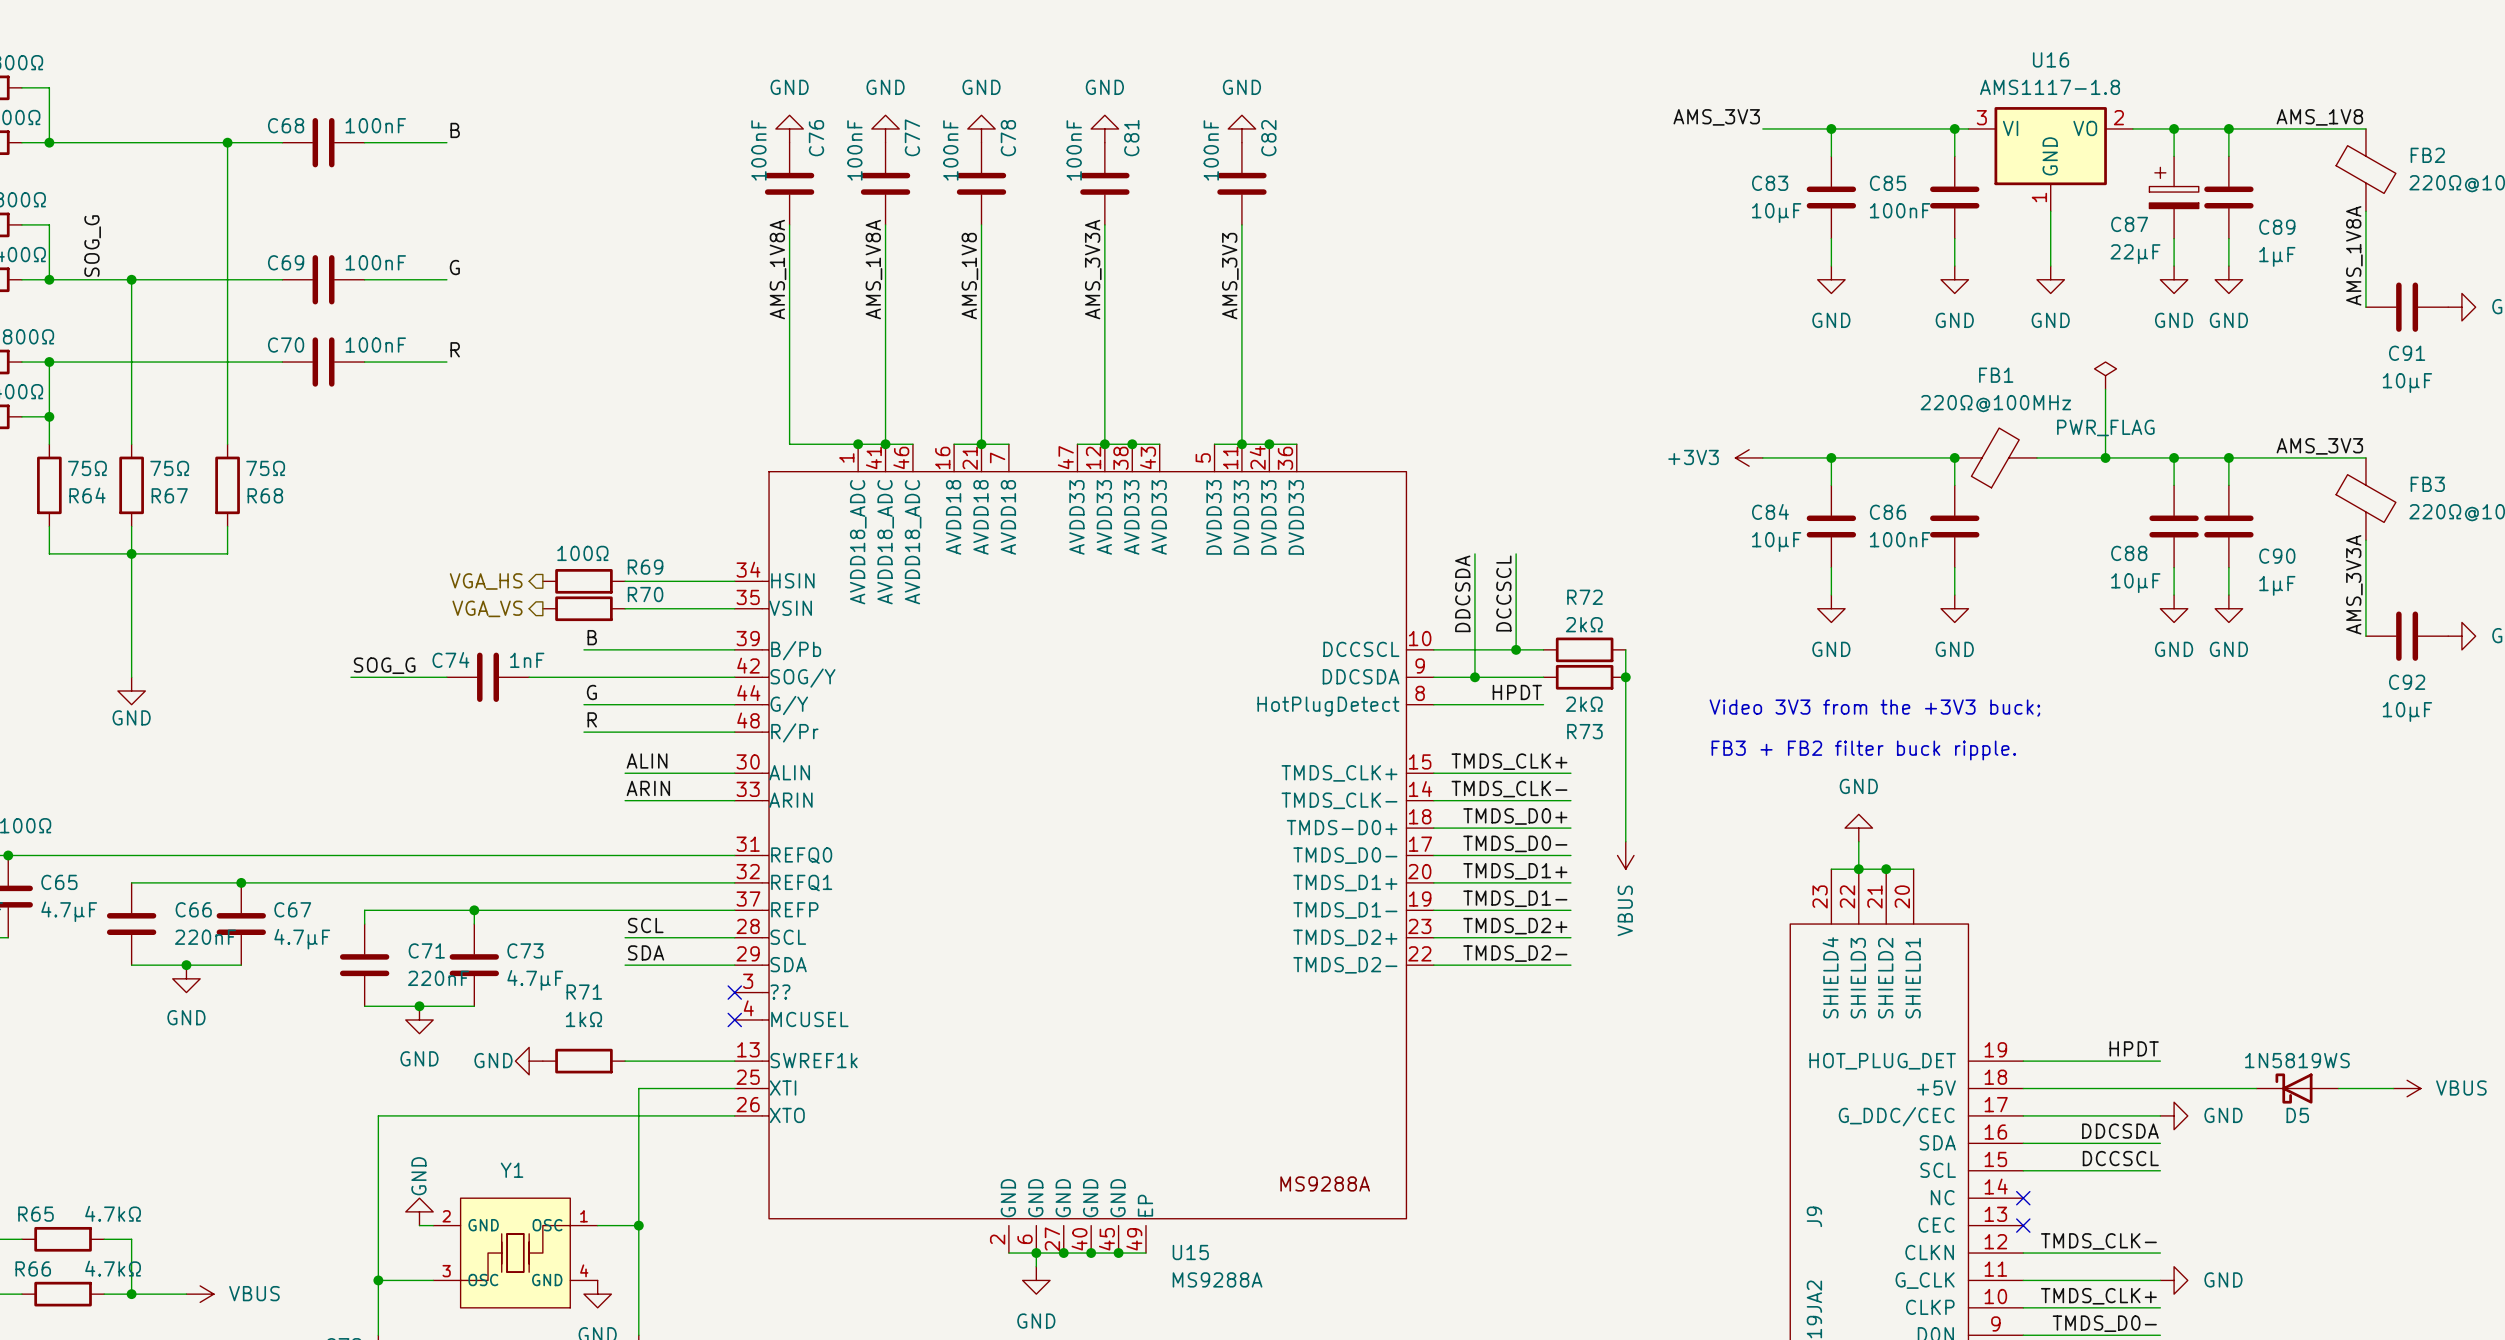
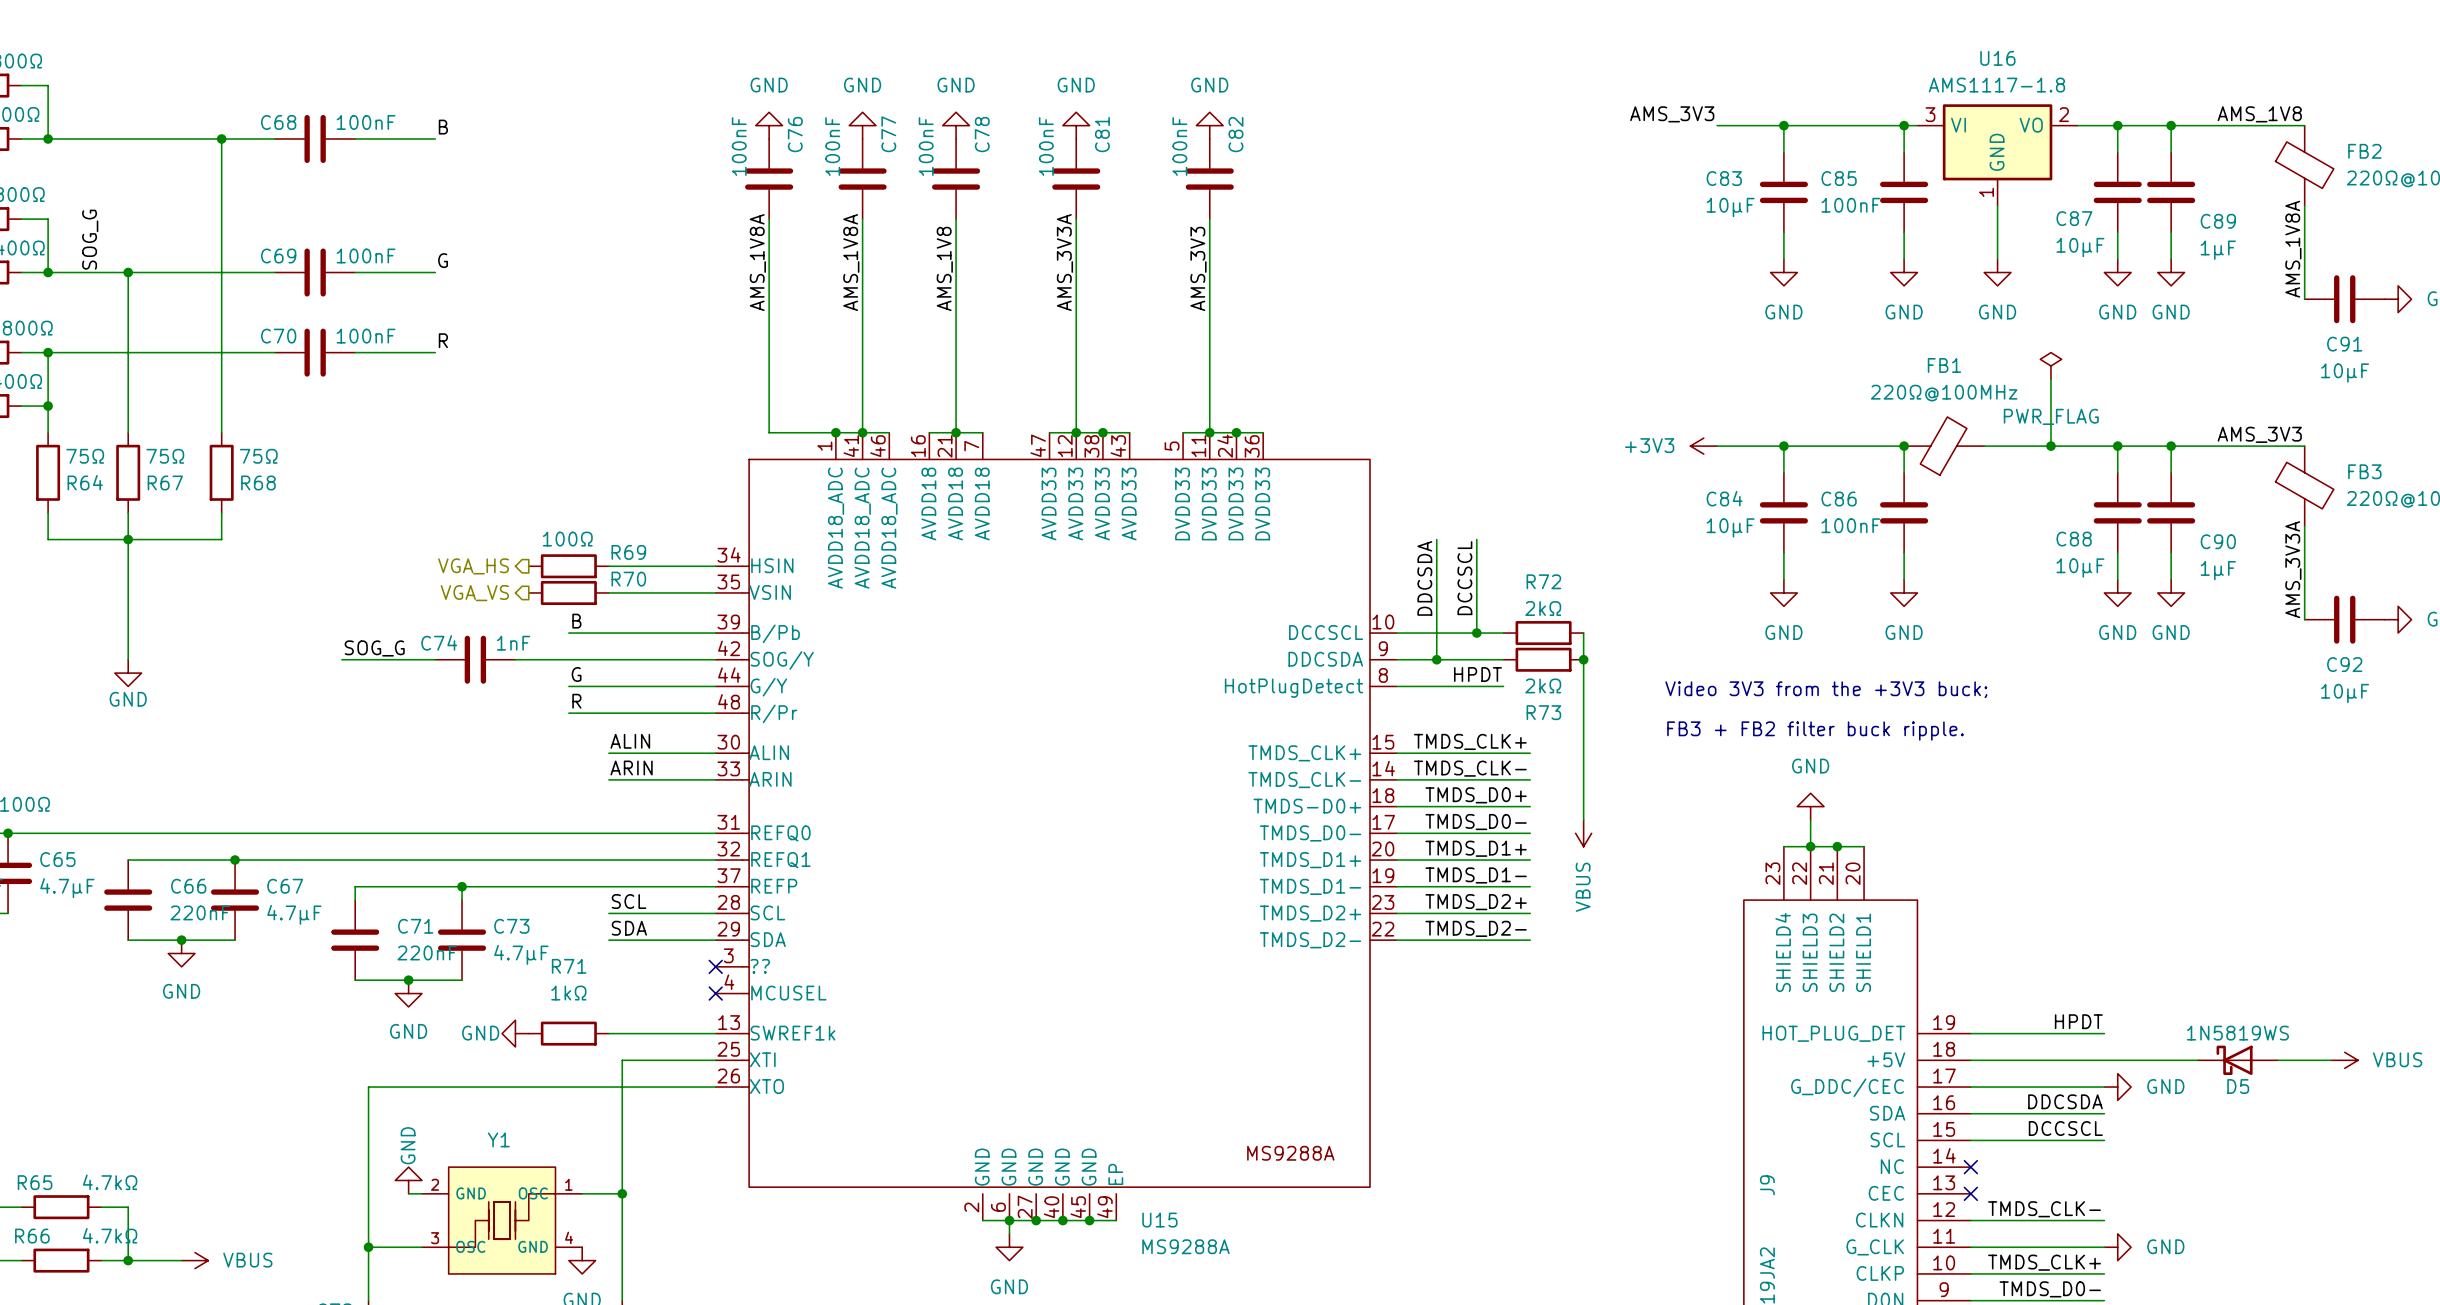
C87 symbol: [2149, 156, 2199, 239] -> [2093, 152, 2142, 233]
C87 value: 22µF (2135, 254) -> 10µF (2080, 247)

